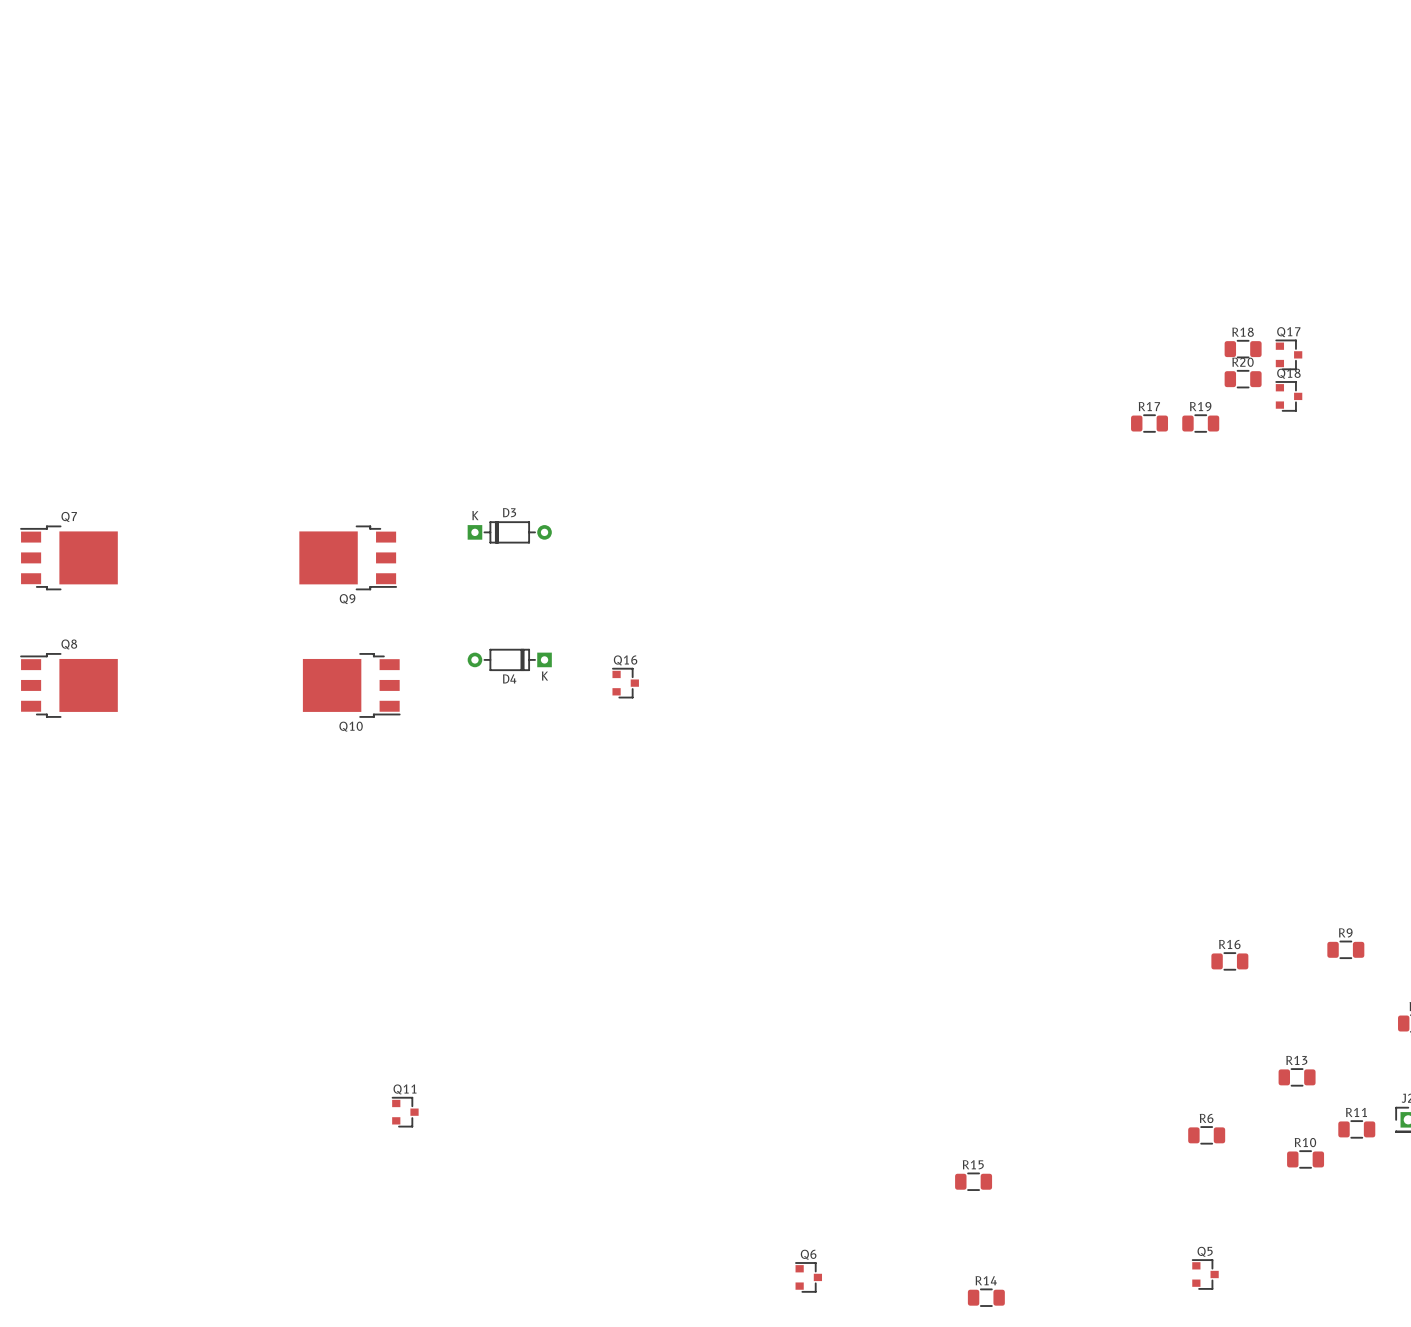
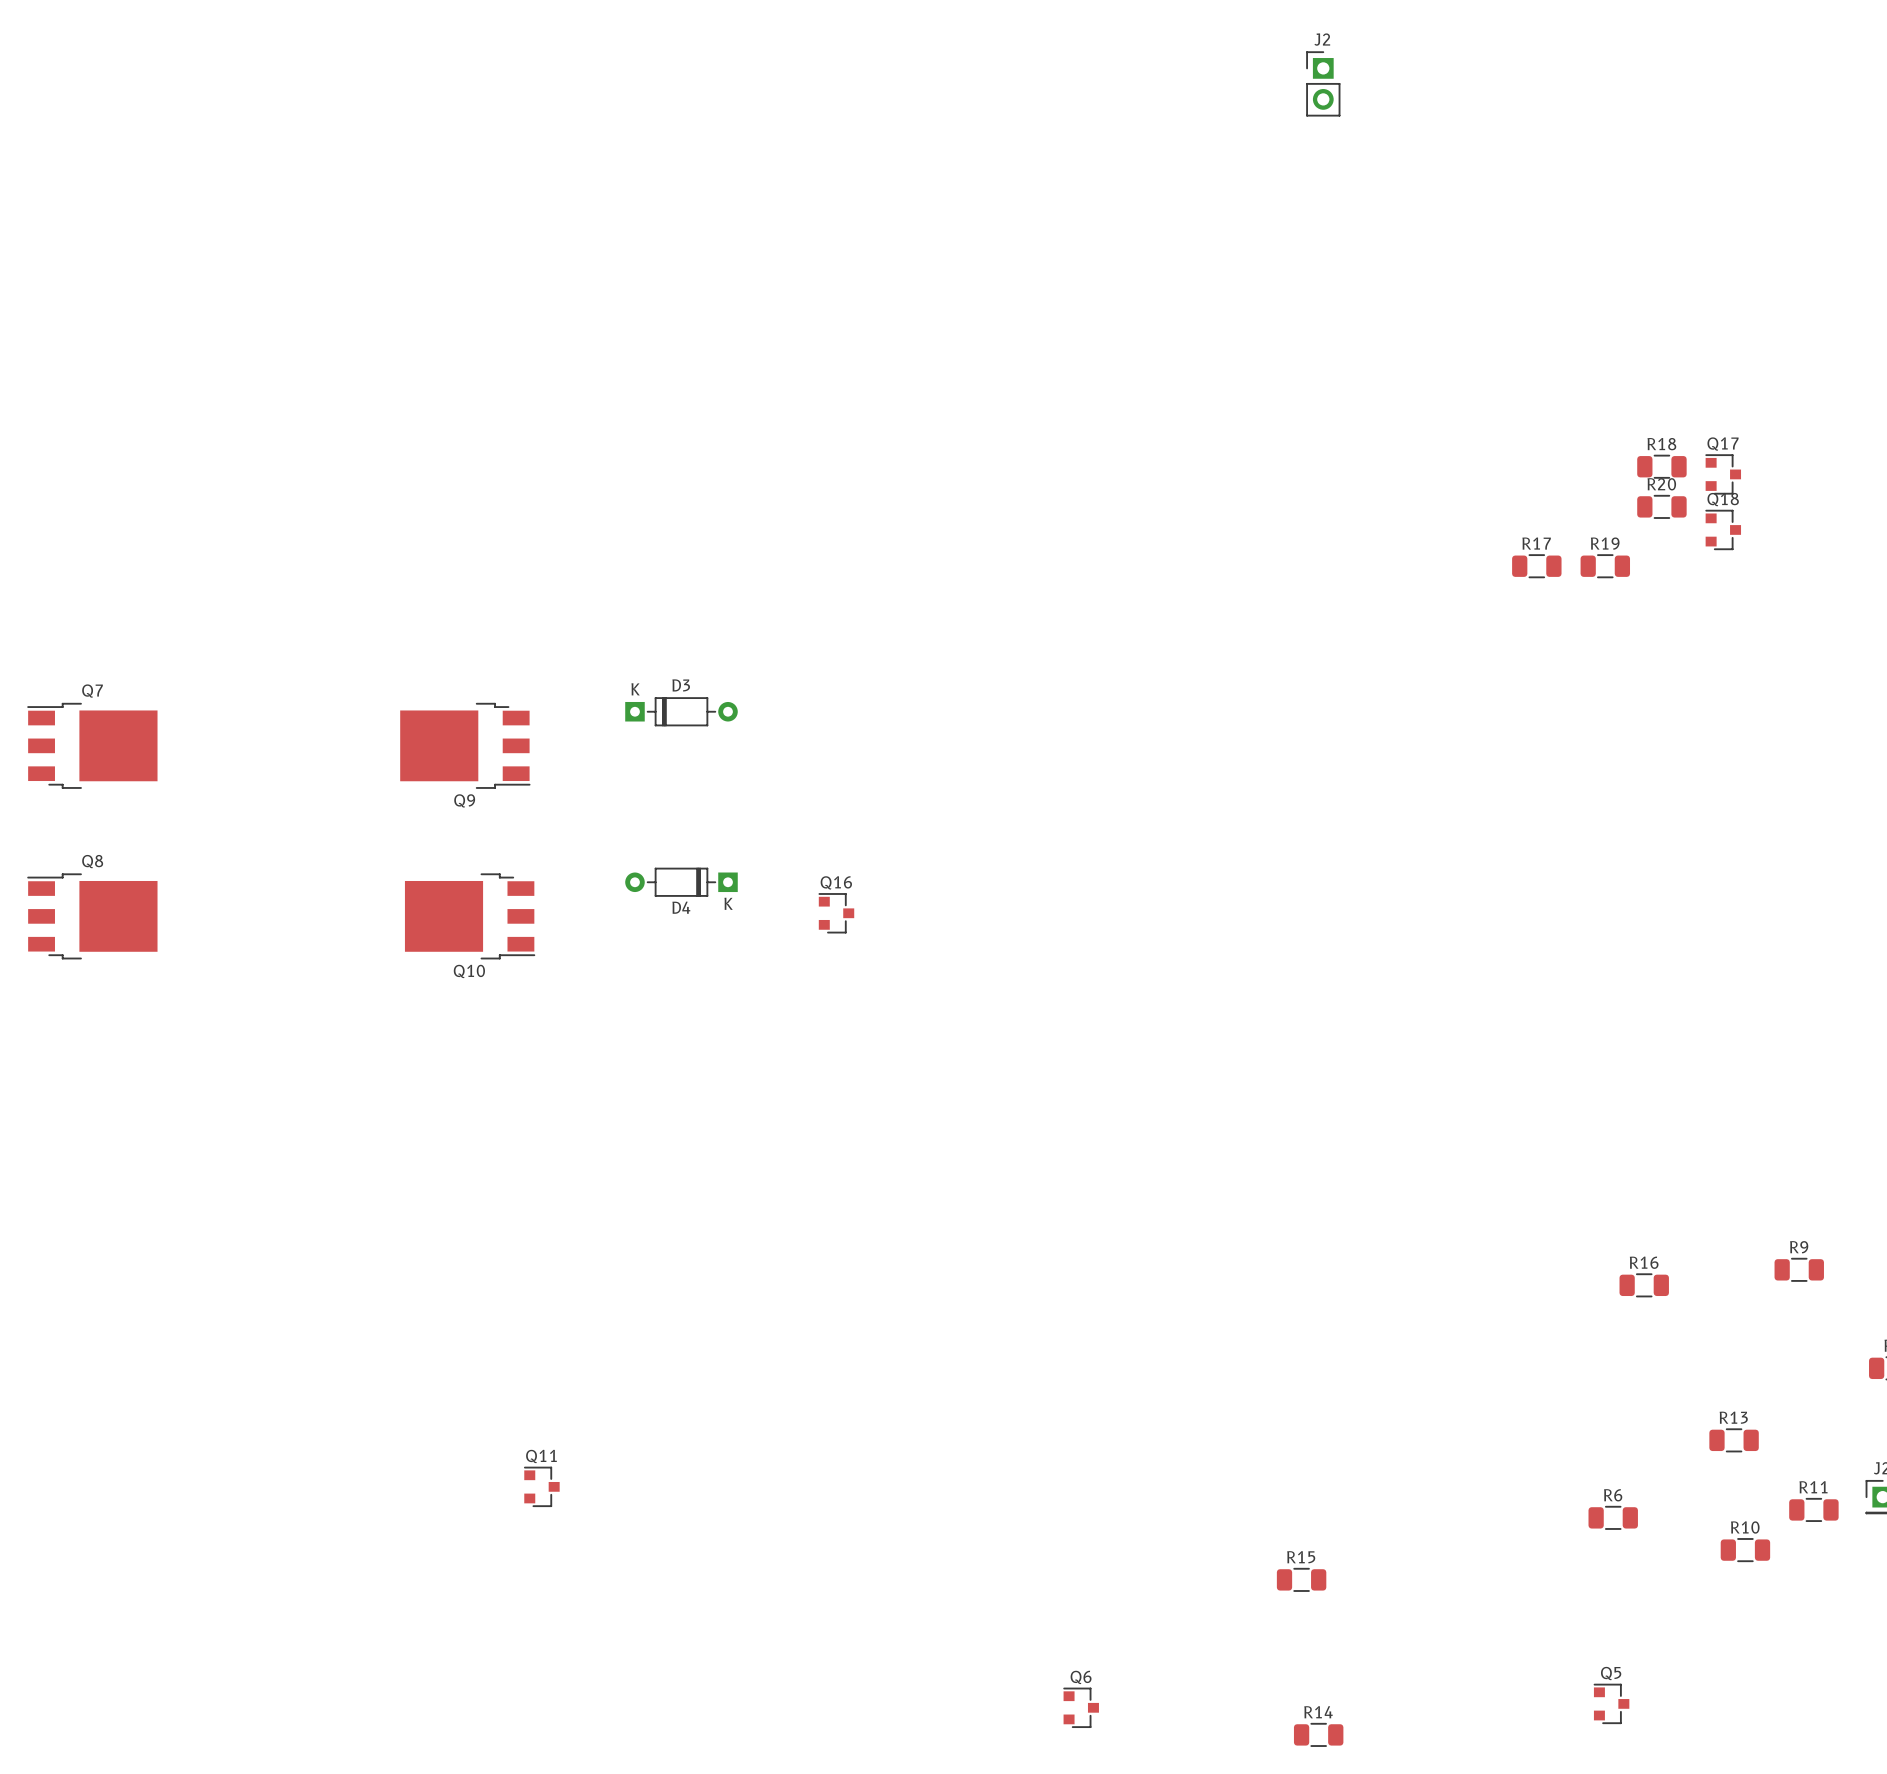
J2: none -> (1323, 83)

